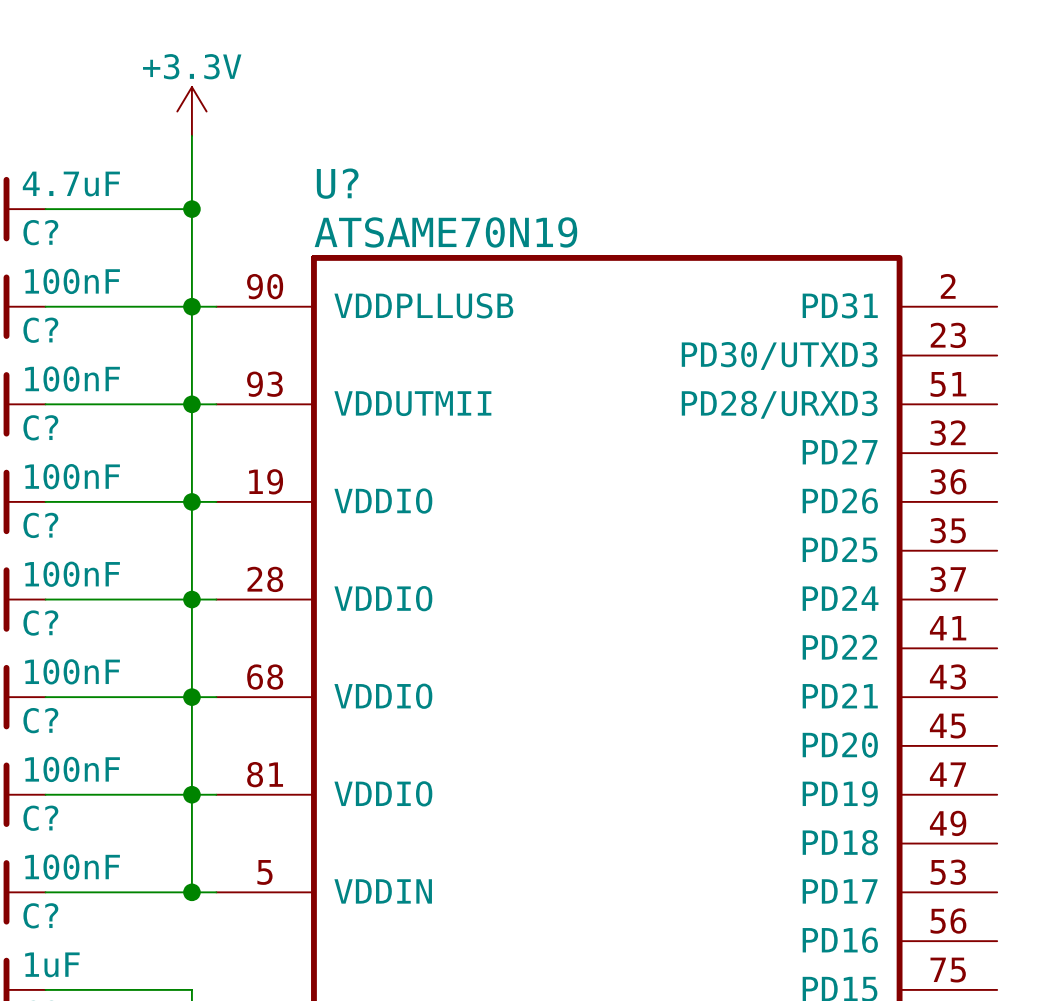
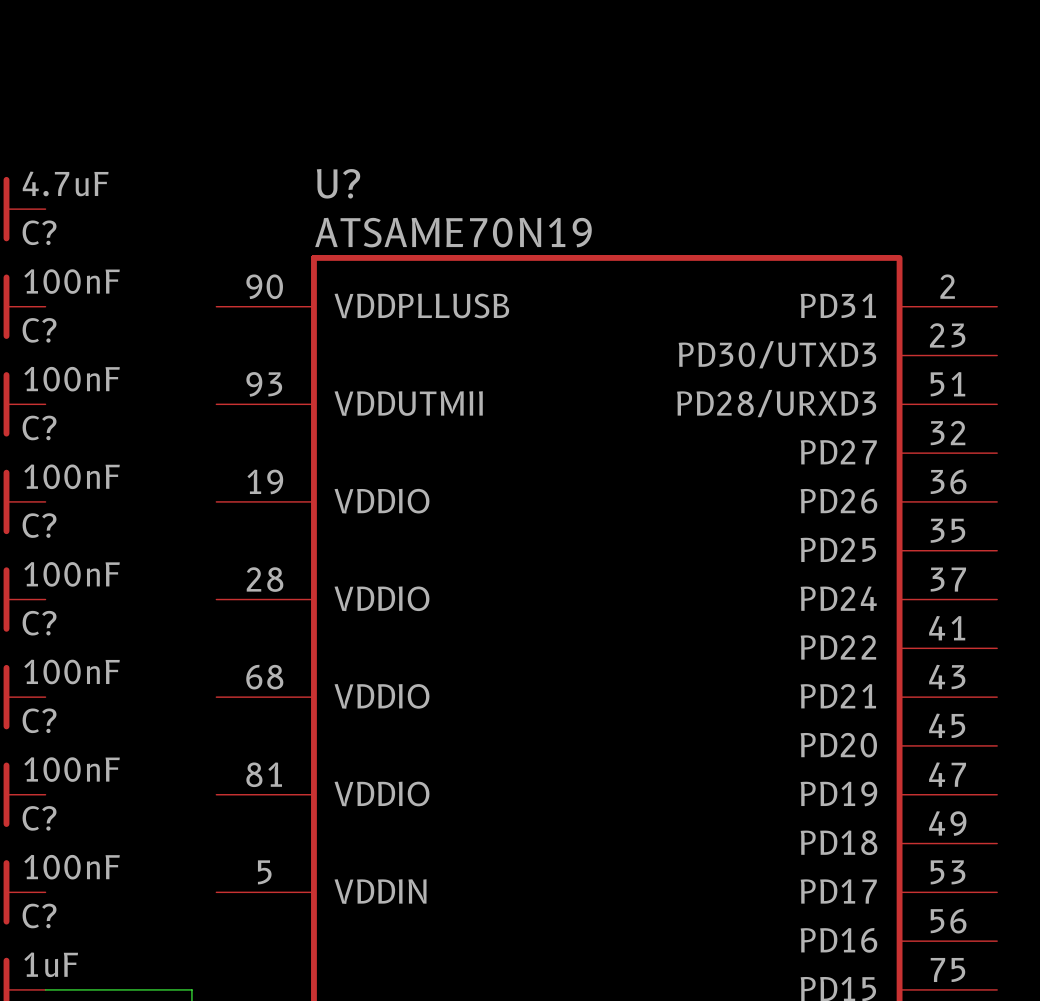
power symbol: +3.3V (191, 111) -> none
wire: (191, 135) (191, 892) -> none
wire: (45, 209) (191, 209) -> none
junction: (191, 209) -> none
wire: (45, 306) (216, 306) -> none
junction: (191, 306) -> none
wire: (45, 404) (216, 404) -> none
junction: (191, 404) -> none
wire: (45, 501) (216, 501) -> none
junction: (191, 501) -> none
wire: (45, 599) (216, 599) -> none
junction: (191, 599) -> none
wire: (45, 697) (216, 697) -> none
junction: (191, 697) -> none
wire: (45, 794) (216, 794) -> none
junction: (191, 794) -> none
wire: (45, 892) (216, 892) -> none
junction: (191, 892) -> none

